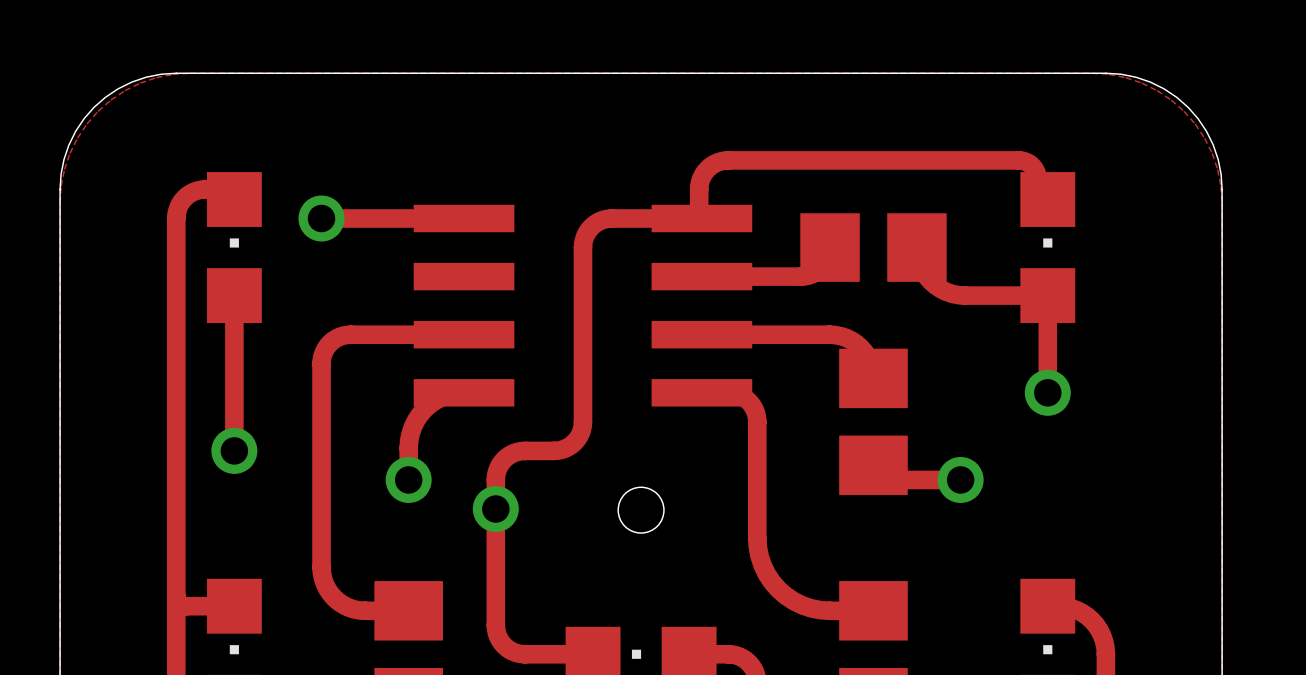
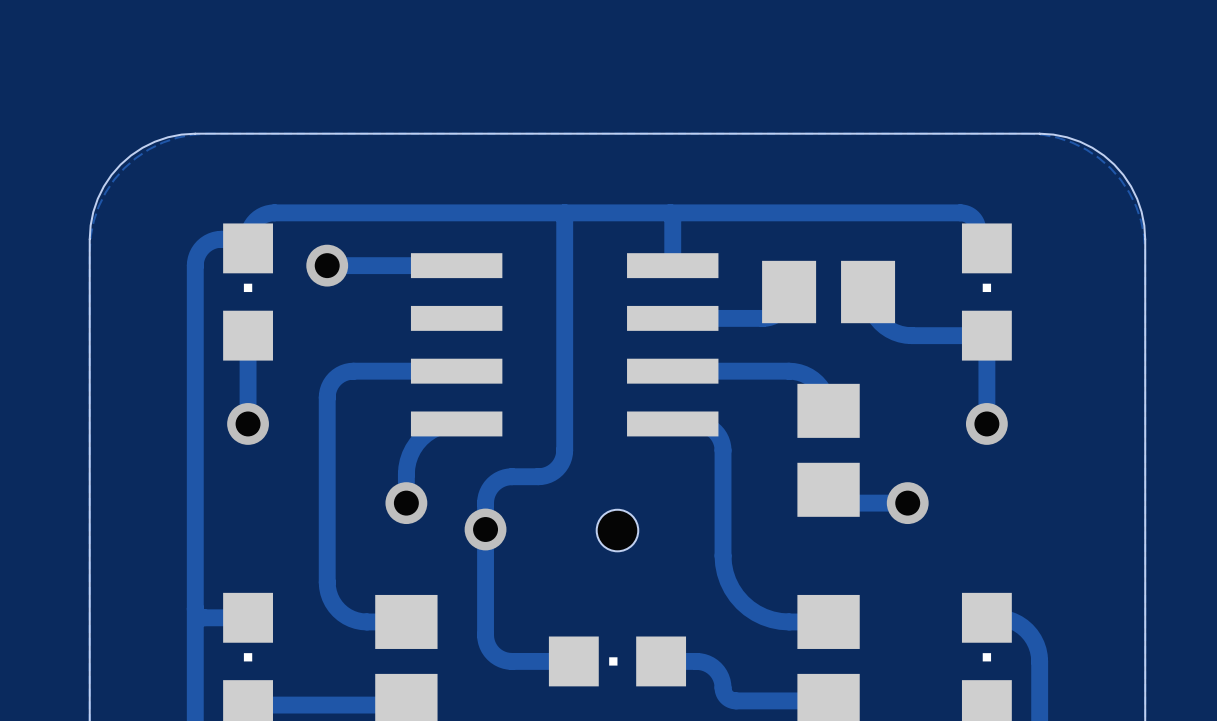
track: none -> (670, 212) (672, 215) (672, 265)
track: (728, 160) (713, 164) (703, 174) (699, 185) (699, 215) -> (696, 212) (271, 213) (258, 218) (251, 226) (248, 235) (248, 248)
track: (701, 218) (604, 219) (588, 229) (582, 247) -> (564, 212) (564, 292)
track: (234, 392) (234, 450) -> none
via position: (234, 450) -> (248, 423)

